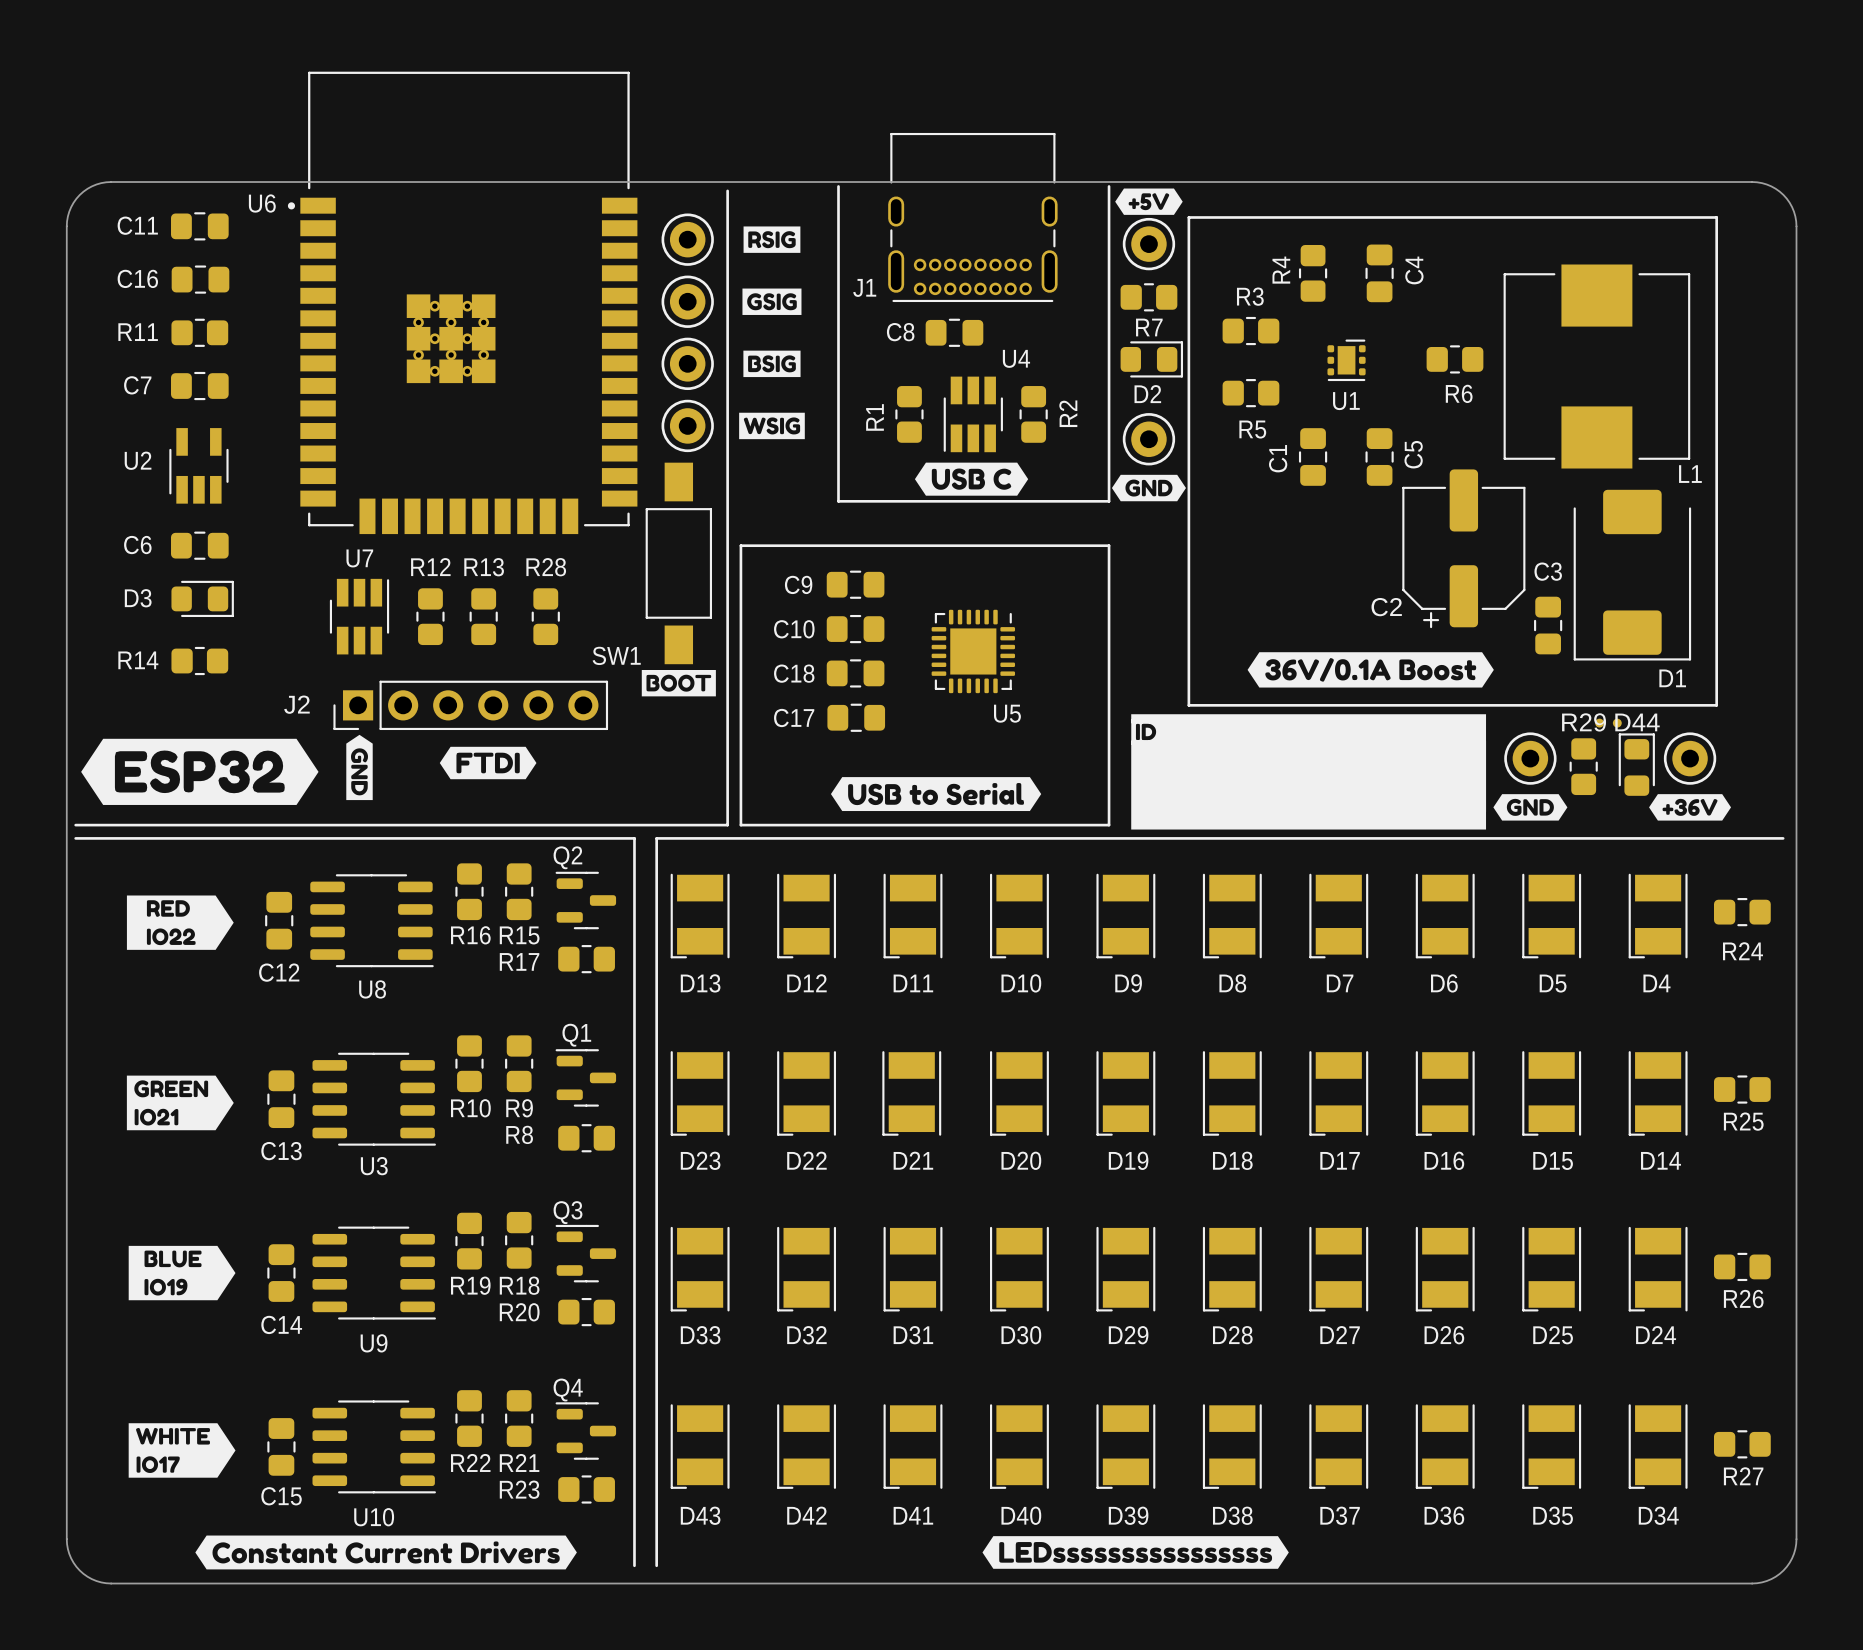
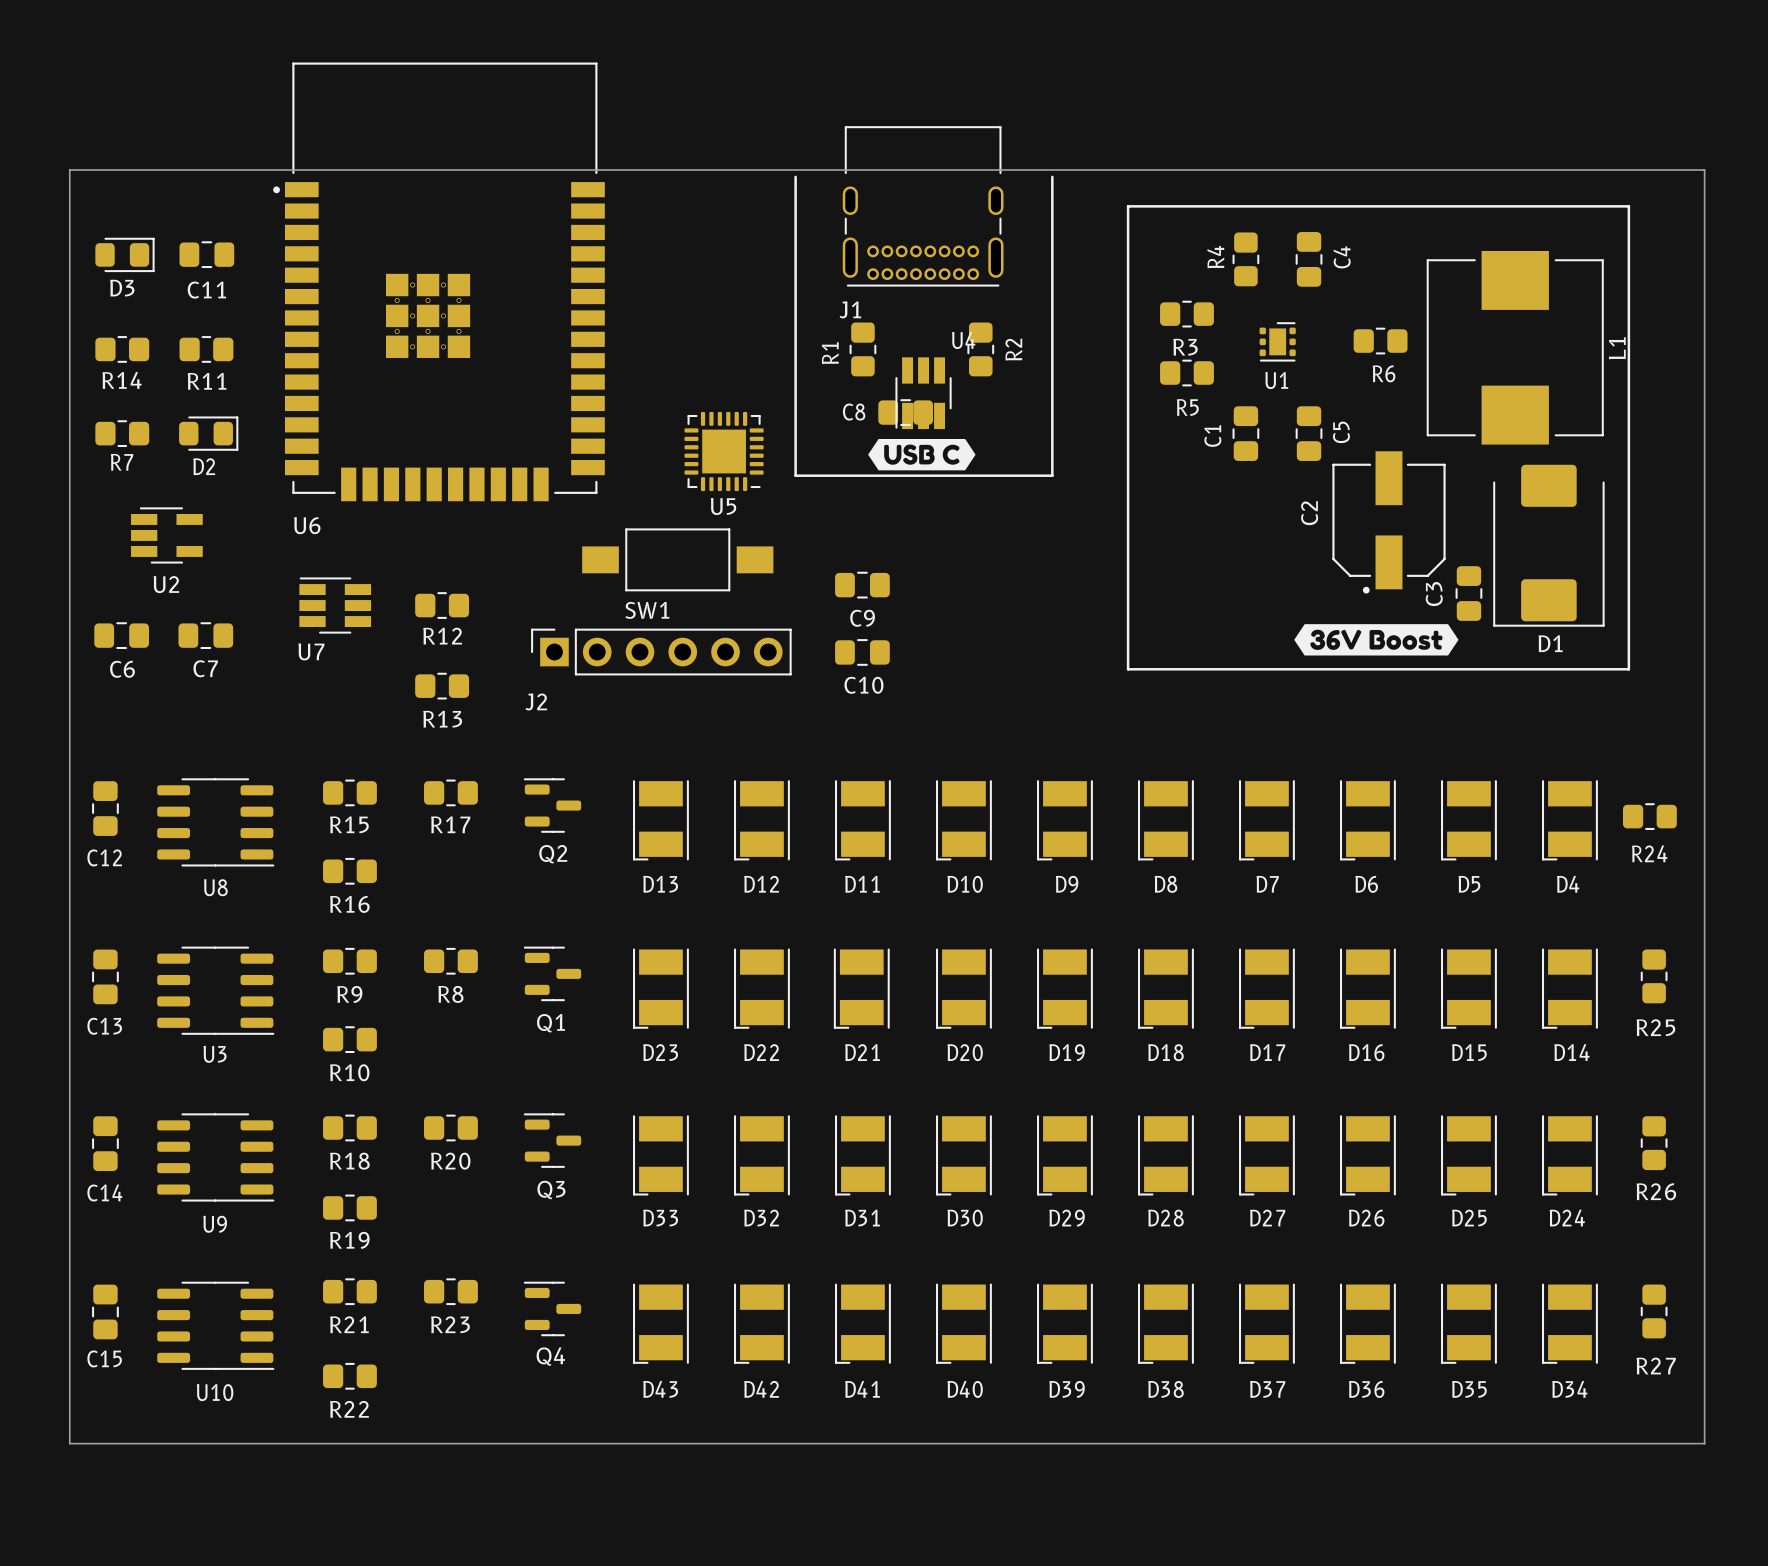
U6 footprint: [287, 71, 638, 535] -> [273, 62, 605, 502]
drawing: [1115, 188, 1183, 215] -> none
line: (727, 190) (727, 825) (75, 825) -> none
U6 name position: U6 (262, 203) -> U6 (307, 525)
C11 name position: C11 (137, 225) -> C11 (206, 290)
C11 position: (199, 226) -> (206, 254)
drawing: [743, 226, 801, 253] -> none
board edge: (1796, 226) (1794, 211) (1783, 195) (1766, 184) (1752, 182) (111, 182) (96, 184) (83, 191) (71, 207) (66, 226) (66, 1539) (69, 1553) (79, 1570) (96, 1581) (111, 1583) (1752, 1583) (1771, 1579) (1786, 1566) (1795, 1549) (1796, 1521) -> (1704, 214) (1704, 170) (69, 170) (69, 1443) (1704, 1443)
part: (687, 239) -> none
part: (1148, 244) -> none
C16: (200, 279) -> none
J1 name position: J1 (864, 287) -> J1 (850, 309)
drawing: [742, 288, 802, 315] -> none
R3 name position: R3 (1250, 296) -> R3 (1185, 347)
R7 position: (1148, 297) -> (122, 433)
part: (687, 301) -> none
R11 name position: R11 (138, 332) -> R11 (207, 381)
R11 position: (199, 332) -> (206, 349)
C8 position: (954, 332) -> (905, 412)
drawing: [743, 350, 801, 378] -> none
D2 position: (1151, 359) -> (208, 433)
part: (687, 363) -> none
C7 name position: C7 (137, 385) -> C7 (205, 668)
C7 position: (199, 386) -> (205, 635)
drawing: [739, 412, 805, 440] -> none
R1 position: (909, 414) -> (862, 349)
R2 position: (1033, 414) -> (980, 349)
part: (687, 425) -> none
part: (1148, 439) -> none
U2 name position: U2 (138, 460) -> U2 (166, 584)
U2 rotation: 0° (198, 465) -> 90° clockwise (166, 535)
U2 position: (198, 465) -> (166, 535)
C2 footprint: [1402, 469, 1526, 629] -> [1332, 451, 1446, 594]
drawing: [1111, 474, 1186, 502] -> none
L1 name rotation: 0° (1690, 474) -> 90° counterclockwise (1617, 348)
L1 name position: L1 (1690, 474) -> L1 (1617, 348)
C6 name position: C6 (137, 545) -> C6 (122, 669)
C6 position: (199, 545) -> (121, 635)
line: (740, 545) (1109, 545) (1109, 825) (740, 825) (740, 545) -> none
U7 name position: U7 (359, 558) -> U7 (311, 651)
SW1 rotation: 0° (678, 563) -> 90° clockwise (677, 559)
R12 name position: R12 (430, 567) -> R12 (442, 636)
R13 name position: R13 (484, 567) -> R13 (442, 719)
C3 name rotation: 0° (1548, 571) -> 90° counterclockwise (1434, 594)
C3 name position: C3 (1548, 571) -> C3 (1434, 594)
C9 name position: C9 (798, 584) -> C9 (862, 618)
C9 position: (855, 584) -> (862, 585)
D3 name position: D3 (138, 598) -> D3 (122, 288)
D3 position: (202, 598) -> (124, 254)
C2 name rotation: 0° (1386, 607) -> 90° counterclockwise (1309, 513)
C2 name position: C2 (1386, 607) -> C2 (1309, 513)
U7 rotation: 0° (359, 616) -> 90° counterclockwise (335, 605)
R12 rotation: 0° (430, 616) -> 90° clockwise (442, 605)
R12 position: (430, 616) -> (442, 605)
R13 rotation: 0° (483, 616) -> 90° clockwise (442, 686)
R13 position: (483, 616) -> (442, 686)
R28: (545, 616) -> none
C10 name position: C10 (794, 629) -> C10 (863, 685)
C10 position: (855, 629) -> (862, 652)
U5 rotation: 0° (973, 651) -> 90° clockwise (724, 451)
U5 position: (973, 651) -> (724, 451)
drawing: [1247, 652, 1494, 688] -> none
SW1 name position: SW1 (616, 655) -> SW1 (647, 610)
drawing: none -> [1294, 624, 1459, 656]
R14 name position: R14 (138, 660) -> R14 (122, 380)
R14 position: (199, 661) -> (122, 349)
drawing: [641, 669, 716, 697] -> none
C18: (855, 673) -> none
D1 name position: D1 (1672, 678) -> D1 (1550, 643)
J2 footprint: [333, 680, 609, 731] -> [531, 628, 792, 676]
J2 name position: J2 (296, 704) -> J2 (536, 701)
drawing: [1131, 714, 1568, 830] -> none
C17: (856, 717) -> none
part: (1608, 723) -> none
drawing: [346, 734, 373, 801] -> none
drawing: [81, 738, 319, 805] -> none
drawing: [439, 746, 537, 780] -> none
part: (1530, 758) -> none
part: (1690, 758) -> none
D44: (1636, 764) -> none
R29: (1583, 766) -> none
drawing: [830, 777, 1042, 812] -> none
drawing: [1649, 794, 1732, 821] -> none
line: (75, 838) (634, 838) (634, 1565) -> none
line: (1783, 838) (656, 838) (656, 1565) -> none
Q2 name position: Q2 (567, 857) -> Q2 (553, 854)
R16 rotation: 0° (469, 891) -> 90° clockwise (349, 871)
R16 position: (469, 891) -> (349, 871)
R15 rotation: 0° (519, 891) -> 90° clockwise (349, 792)
R15 position: (519, 891) -> (349, 792)
drawing: [126, 895, 234, 950] -> none
Q2 position: (585, 900) -> (552, 805)
R24 position: (1742, 912) -> (1649, 816)
D13 position: (700, 916) -> (660, 820)
D12 position: (806, 916) -> (761, 820)
D11 position: (913, 916) -> (862, 820)
D10 position: (1019, 916) -> (963, 820)
D9 position: (1125, 916) -> (1064, 820)
D8 position: (1232, 916) -> (1165, 820)
D7 position: (1338, 916) -> (1266, 820)
D6 position: (1445, 916) -> (1367, 820)
D5 position: (1551, 916) -> (1468, 820)
D4 position: (1658, 916) -> (1569, 820)
C12 position: (279, 920) -> (105, 808)
U8 position: (372, 920) -> (215, 822)
R17 position: (586, 959) -> (450, 792)
R17 name position: R17 (519, 961) -> R17 (450, 824)
Q1 name position: Q1 (576, 1035) -> Q1 (550, 1023)
R10 rotation: 0° (469, 1063) -> 90° clockwise (349, 1039)
R10 position: (469, 1063) -> (349, 1039)
R9 rotation: 0° (519, 1063) -> 90° clockwise (349, 961)
R9 position: (519, 1063) -> (349, 961)
drawing: [126, 1075, 234, 1131] -> none
Q1 position: (585, 1077) -> (552, 973)
R25 rotation: 0° (1742, 1089) -> 90° clockwise (1654, 976)
R25 position: (1742, 1089) -> (1654, 976)
D23 position: (700, 1093) -> (660, 988)
D22 position: (806, 1093) -> (761, 988)
D21 position: (911, 1093) -> (861, 988)
D20 position: (1019, 1093) -> (963, 988)
D19 position: (1125, 1093) -> (1064, 988)
D18 position: (1232, 1093) -> (1165, 988)
D17 position: (1338, 1093) -> (1266, 988)
D16 position: (1445, 1093) -> (1367, 988)
D15 position: (1551, 1093) -> (1468, 988)
D14 position: (1658, 1093) -> (1569, 988)
C13 position: (281, 1099) -> (105, 976)
U3 position: (374, 1099) -> (215, 990)
R8 name position: R8 (519, 1134) -> R8 (450, 994)
R8 position: (586, 1138) -> (450, 961)
Q3 name position: Q3 (567, 1212) -> Q3 (551, 1189)
R18 rotation: 0° (519, 1240) -> 90° clockwise (349, 1127)
R18 position: (519, 1240) -> (349, 1127)
R19 rotation: 0° (469, 1241) -> 90° clockwise (349, 1207)
R19 position: (469, 1241) -> (349, 1207)
drawing: [128, 1245, 236, 1301] -> none
Q3 position: (585, 1253) -> (552, 1140)
R26 rotation: 0° (1742, 1266) -> 90° clockwise (1654, 1143)
R26 position: (1742, 1266) -> (1654, 1143)
D33 position: (700, 1269) -> (660, 1155)
D32 position: (806, 1269) -> (761, 1155)
D31 position: (913, 1269) -> (862, 1155)
D30 position: (1019, 1269) -> (963, 1155)
D29 position: (1125, 1269) -> (1064, 1155)
D28 position: (1232, 1269) -> (1165, 1155)
D27 position: (1338, 1269) -> (1266, 1155)
D26 position: (1445, 1269) -> (1367, 1155)
D25 position: (1551, 1269) -> (1468, 1155)
D24 position: (1658, 1269) -> (1569, 1155)
C14 position: (281, 1273) -> (105, 1143)
U9 position: (374, 1273) -> (215, 1157)
R20 name position: R20 (519, 1312) -> R20 (450, 1161)
R20 position: (586, 1312) -> (450, 1127)
Q4 name position: Q4 (568, 1390) -> Q4 (550, 1356)
R22 rotation: 0° (469, 1418) -> 90° clockwise (349, 1376)
R22 position: (469, 1418) -> (349, 1376)
R21 rotation: 0° (519, 1418) -> 90° clockwise (349, 1291)
R21 position: (519, 1418) -> (349, 1291)
drawing: [128, 1423, 236, 1478] -> none
Q4 position: (585, 1431) -> (552, 1308)
R27 rotation: 0° (1742, 1444) -> 90° clockwise (1654, 1311)
R27 position: (1742, 1444) -> (1654, 1311)
C15 position: (281, 1446) -> (105, 1311)
U10 position: (374, 1446) -> (215, 1325)
D43 position: (700, 1446) -> (660, 1323)
D42 position: (806, 1446) -> (761, 1323)
D41 position: (913, 1446) -> (862, 1323)
D40 position: (1019, 1446) -> (963, 1323)
D39 position: (1125, 1446) -> (1064, 1323)
D38 position: (1232, 1446) -> (1165, 1323)
D37 position: (1338, 1446) -> (1266, 1323)
D36 position: (1445, 1446) -> (1367, 1323)
D35 position: (1551, 1446) -> (1468, 1323)
D34 position: (1658, 1446) -> (1569, 1323)
R23 name position: R23 (519, 1489) -> R23 (450, 1324)
R23 position: (586, 1489) -> (450, 1291)
drawing: [195, 1535, 577, 1570] -> none
drawing: [982, 1536, 1289, 1569] -> none

